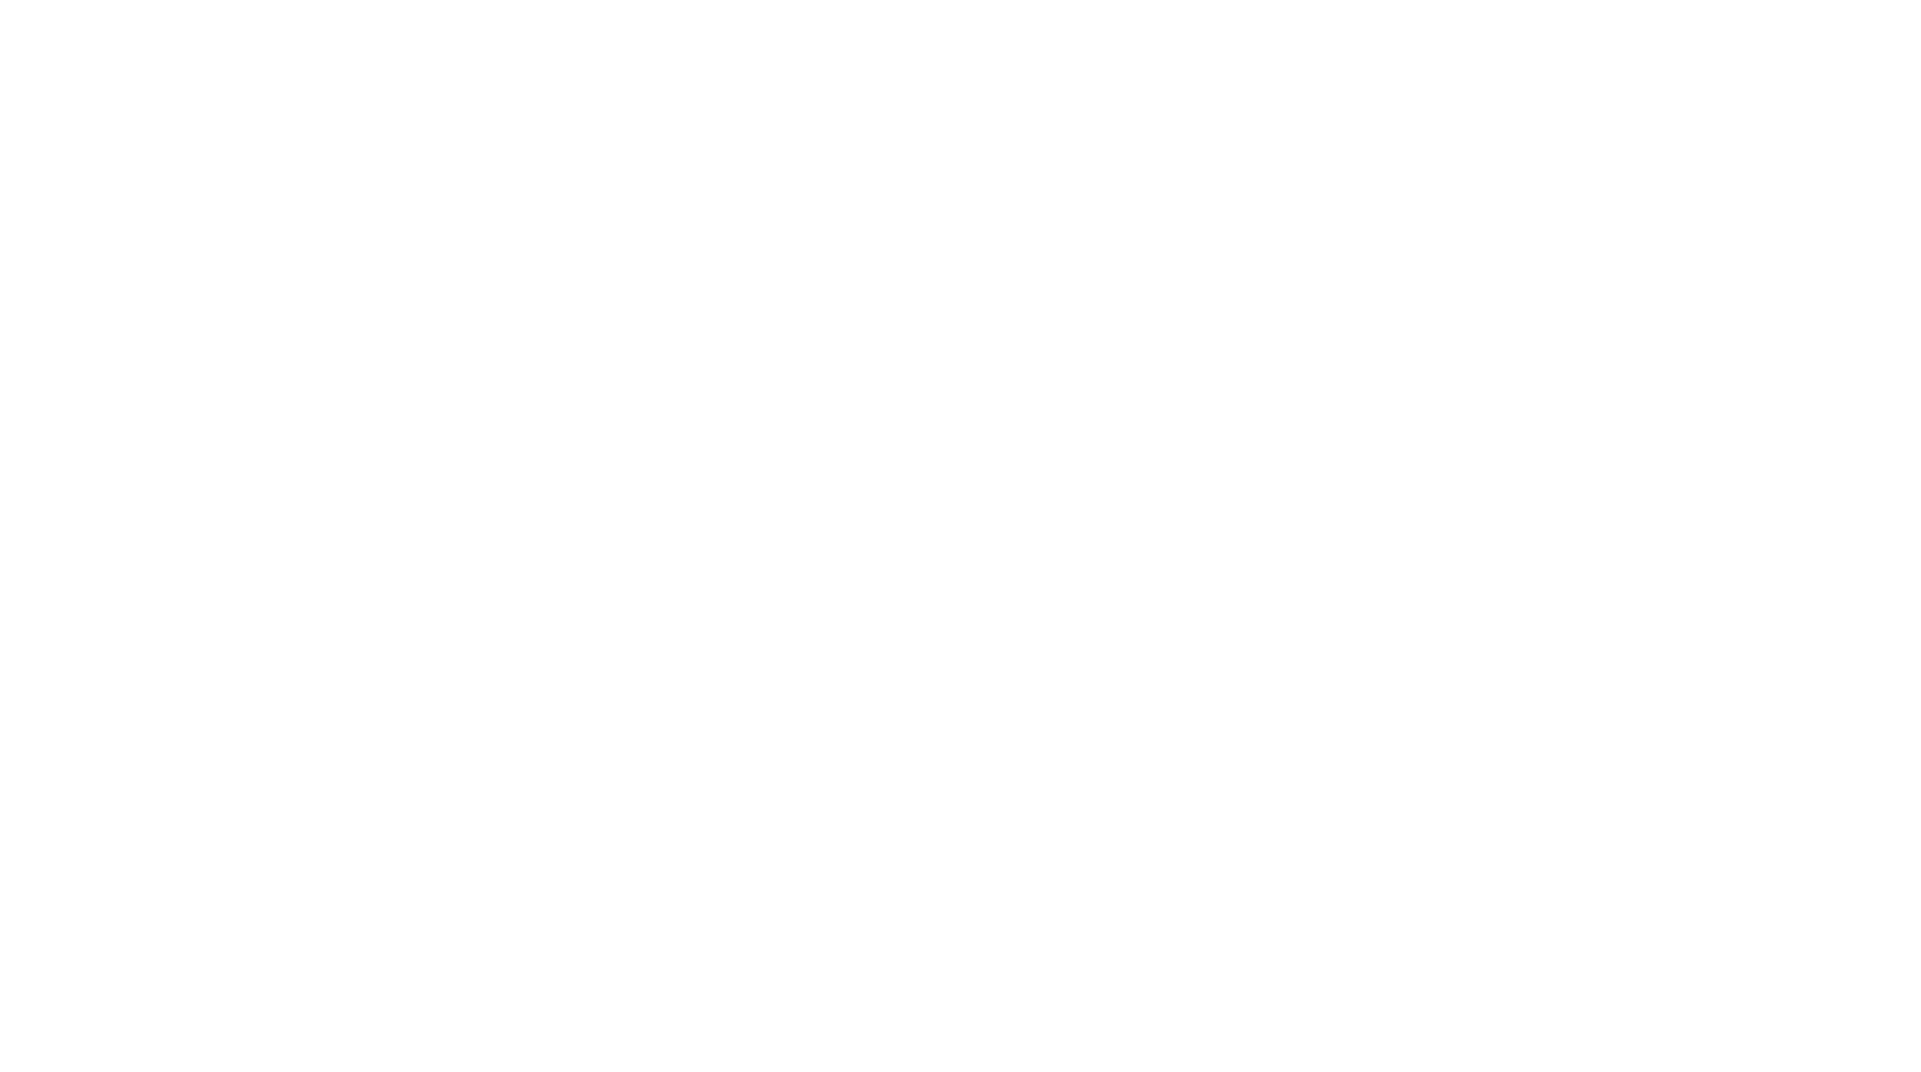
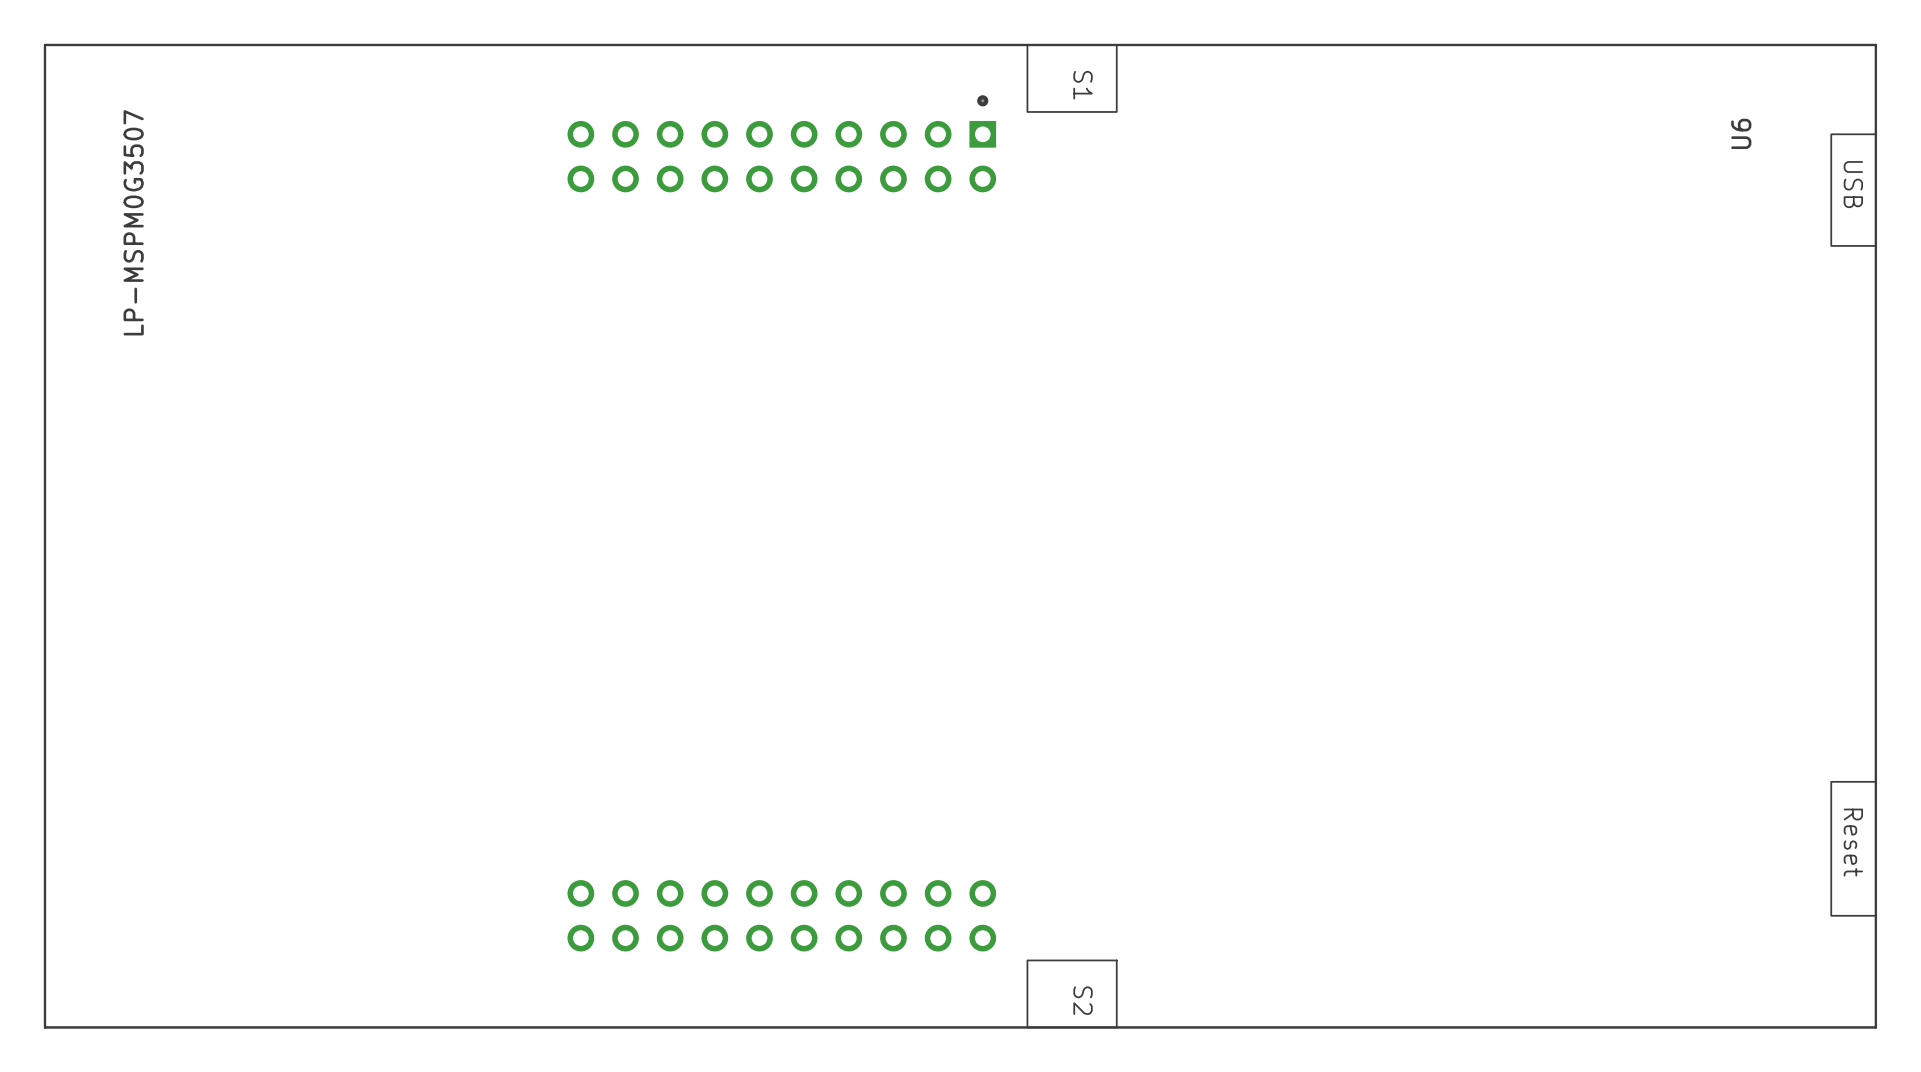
U6: none -> LP-MSPM0G3507 (960, 536)

